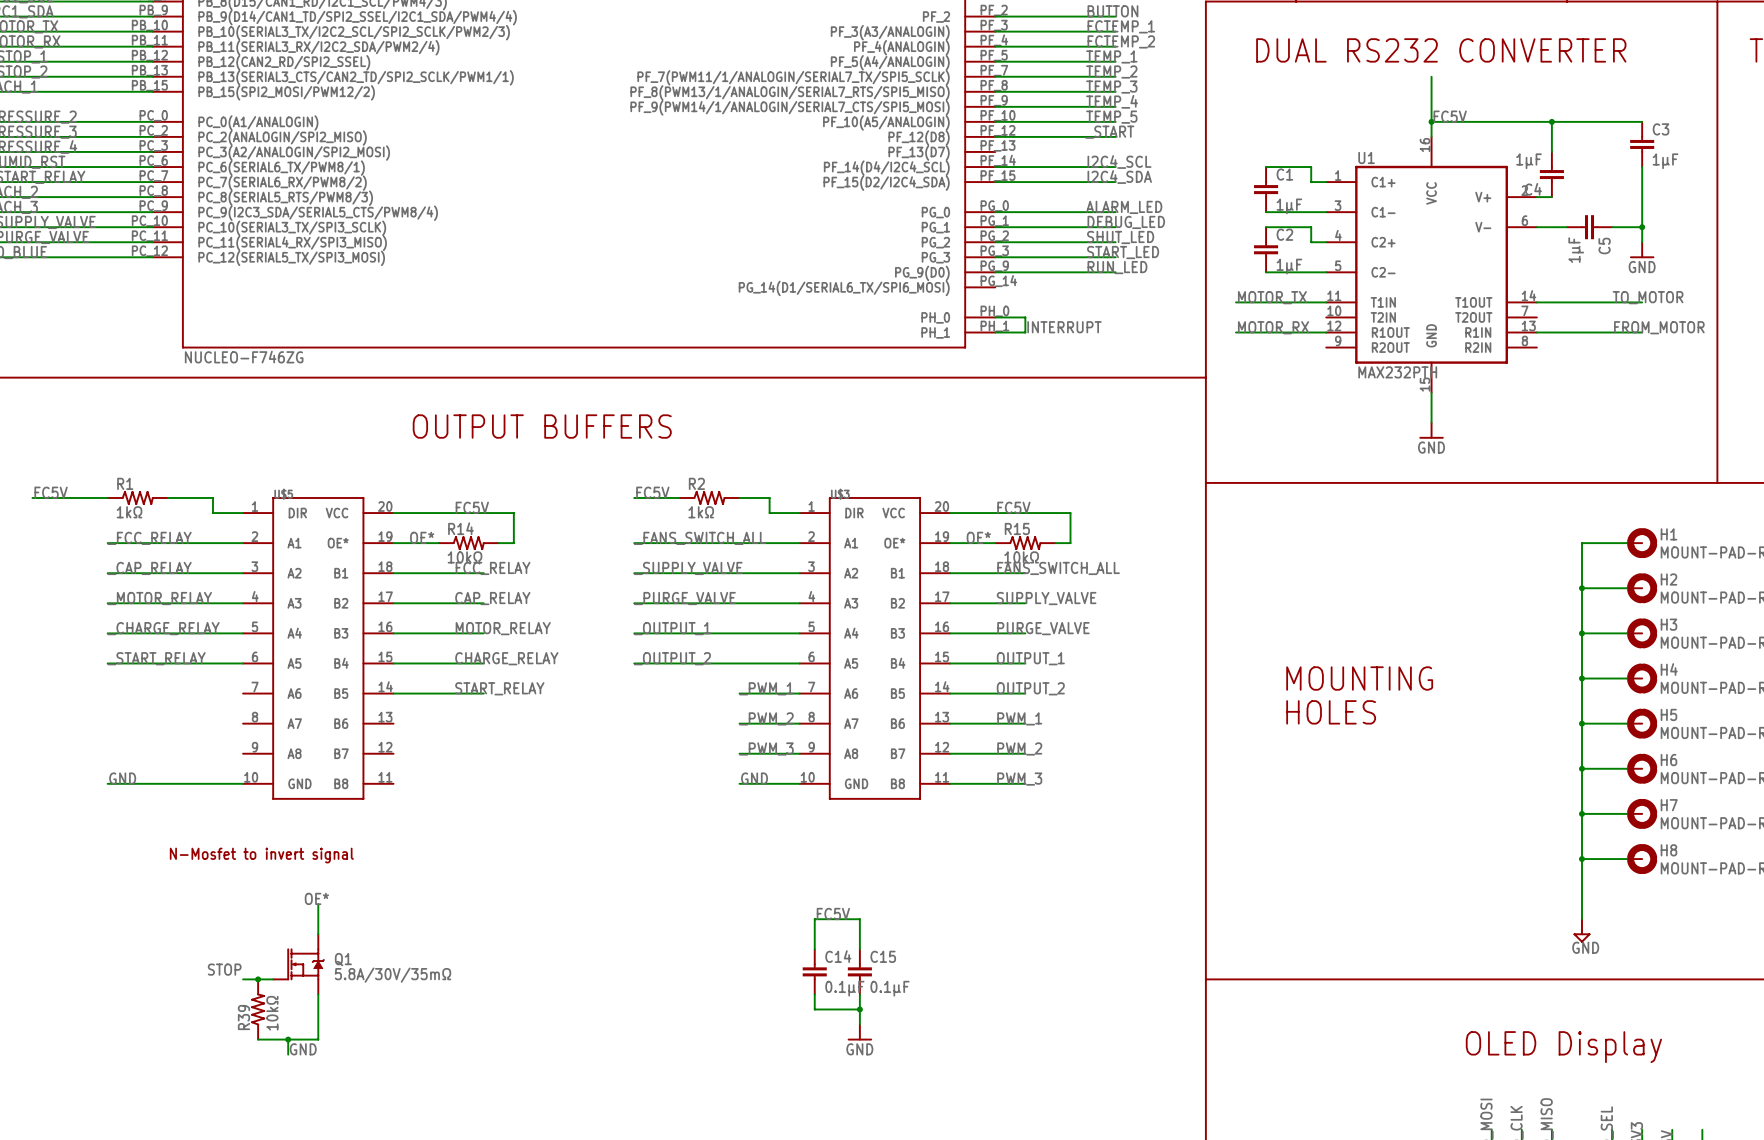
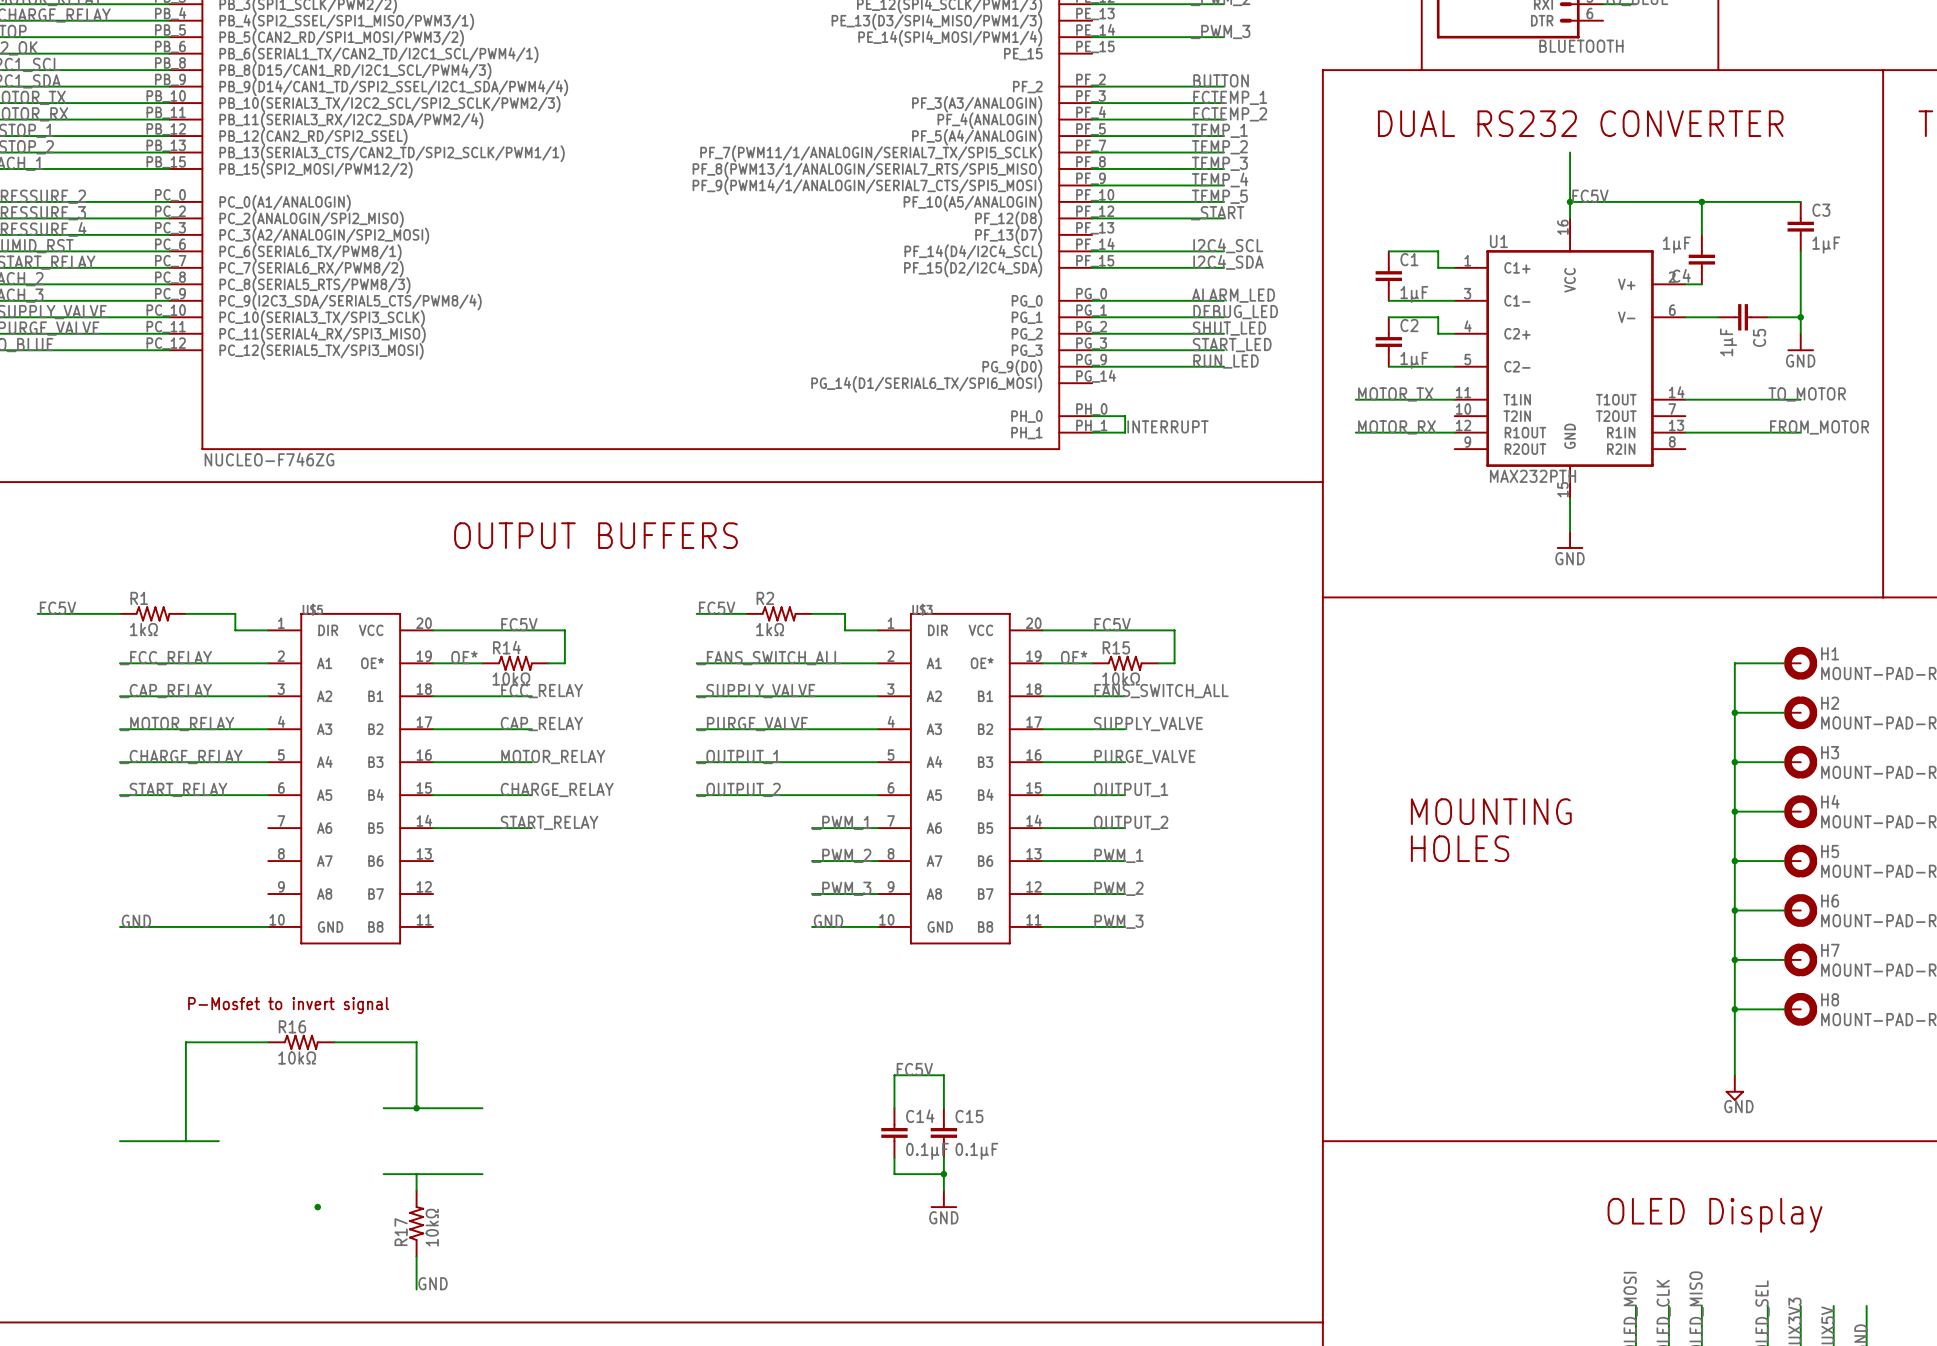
text: N-Mosfet to invert signal (261, 855) -> P-Mosfet to invert signal (288, 1005)
wire: none -> (268, 1042) (185, 1042) (185, 1141)
R16: none -> 10kΩ (301, 1042)
wire: none -> (334, 1042) (416, 1042) (416, 1108)
label: OE* (316, 898) -> none
wire: (318, 904) (318, 934) -> none
wire: none -> (383, 1108) (482, 1108)
junction: none -> (416, 1108)
Q1: 5.8A/30V/35mΩ (298, 964) -> none
label: STOP (224, 969) -> none
wire: none -> (119, 1141) (218, 1141)
wire: (243, 979) (273, 979) -> none
junction: (258, 979) -> none
wire: (318, 994) (318, 1039) (258, 1039) -> none
R39: 10kΩ (258, 1009) -> none
wire: none -> (383, 1174) (482, 1174)
wire: (288, 1039) (288, 1054) -> (416, 1174) (416, 1190)
label position: GND (303, 1049) -> GND (433, 1283)
R17: none -> 10kΩ (416, 1223)
wire: none -> (416, 1256) (416, 1289)

